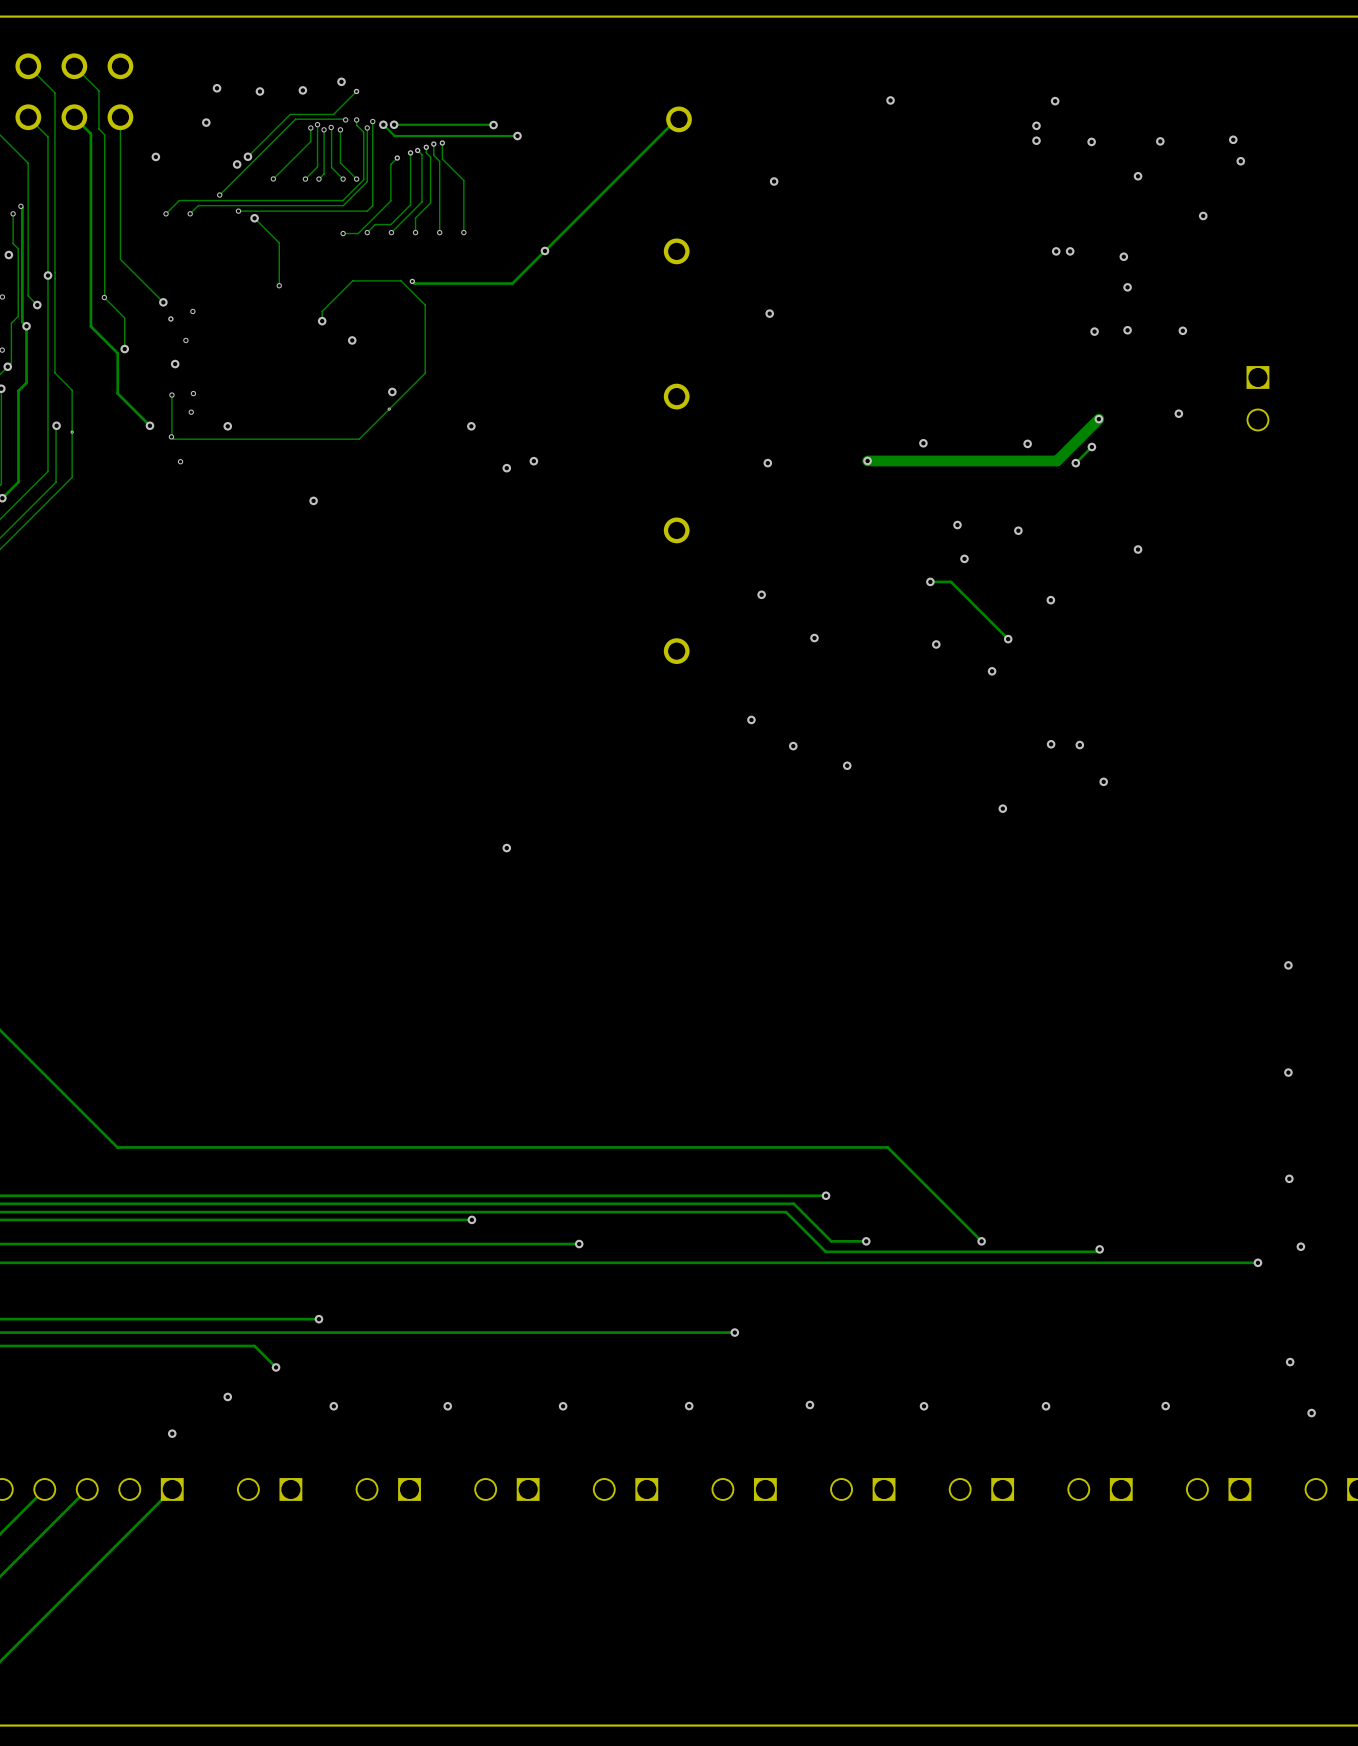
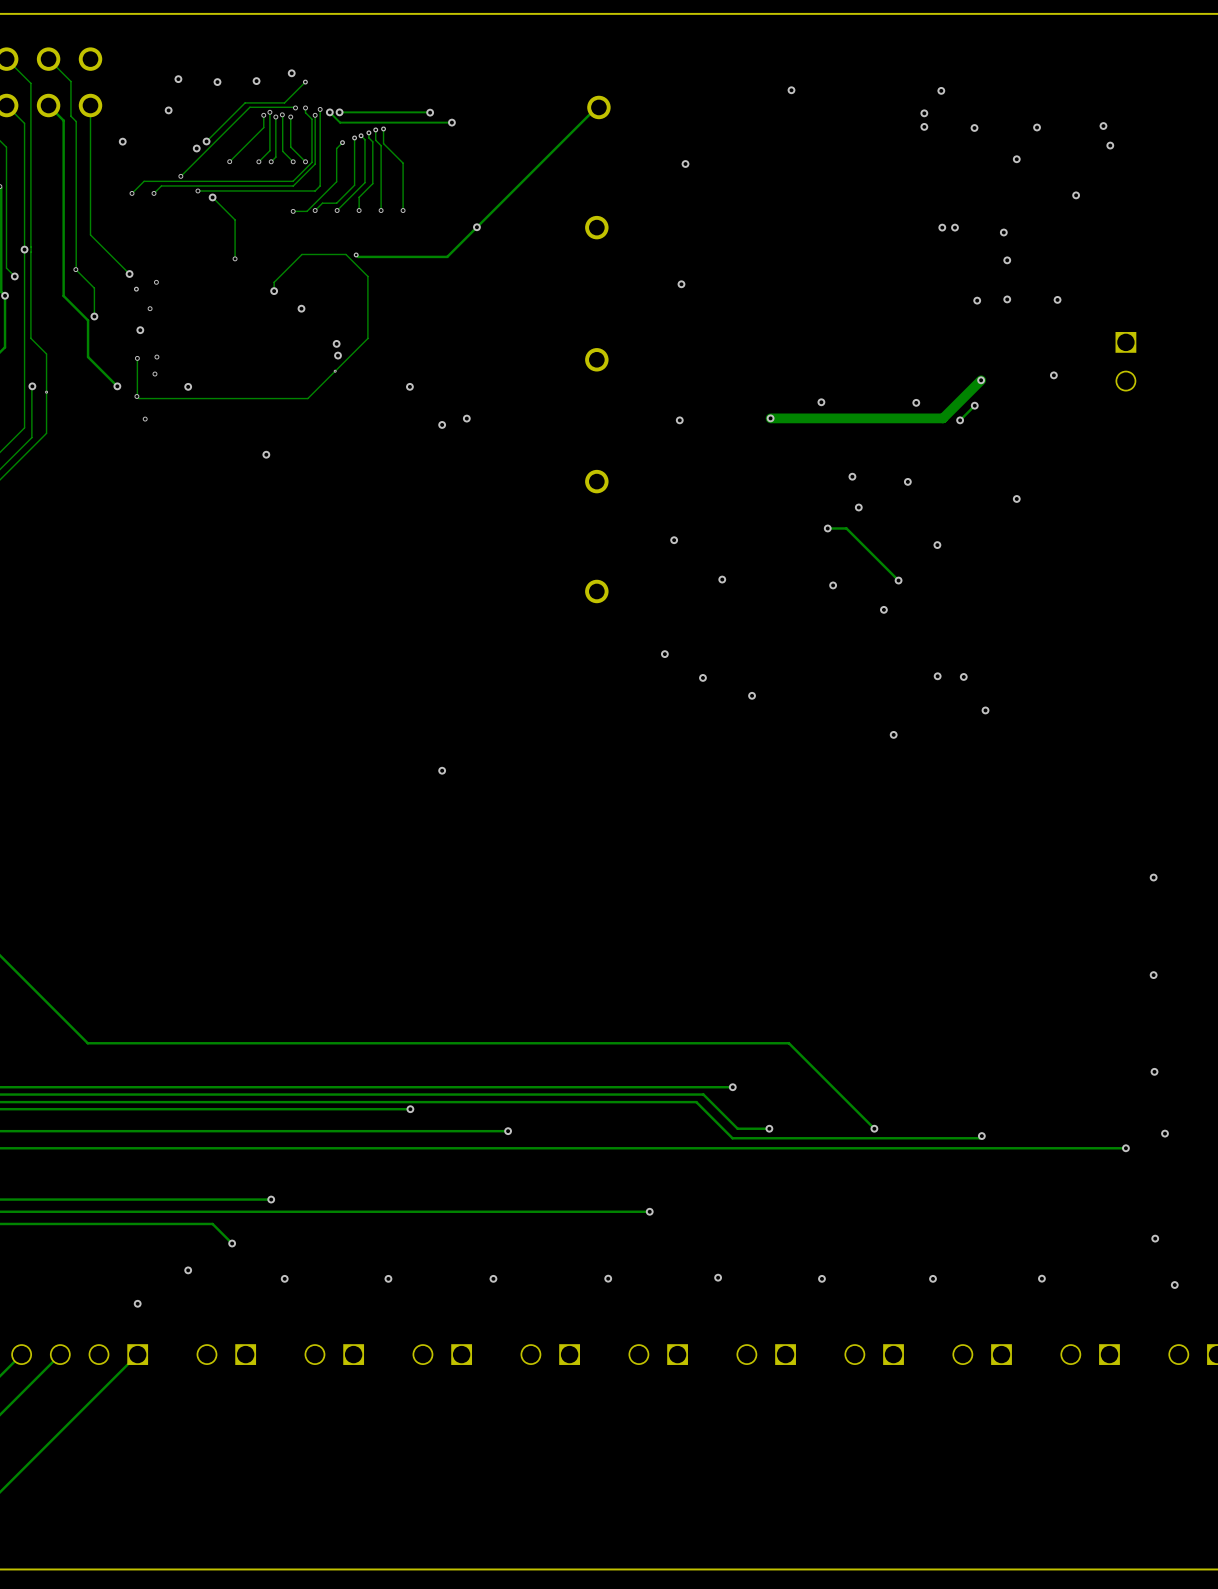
via: none -> (336, 343)

